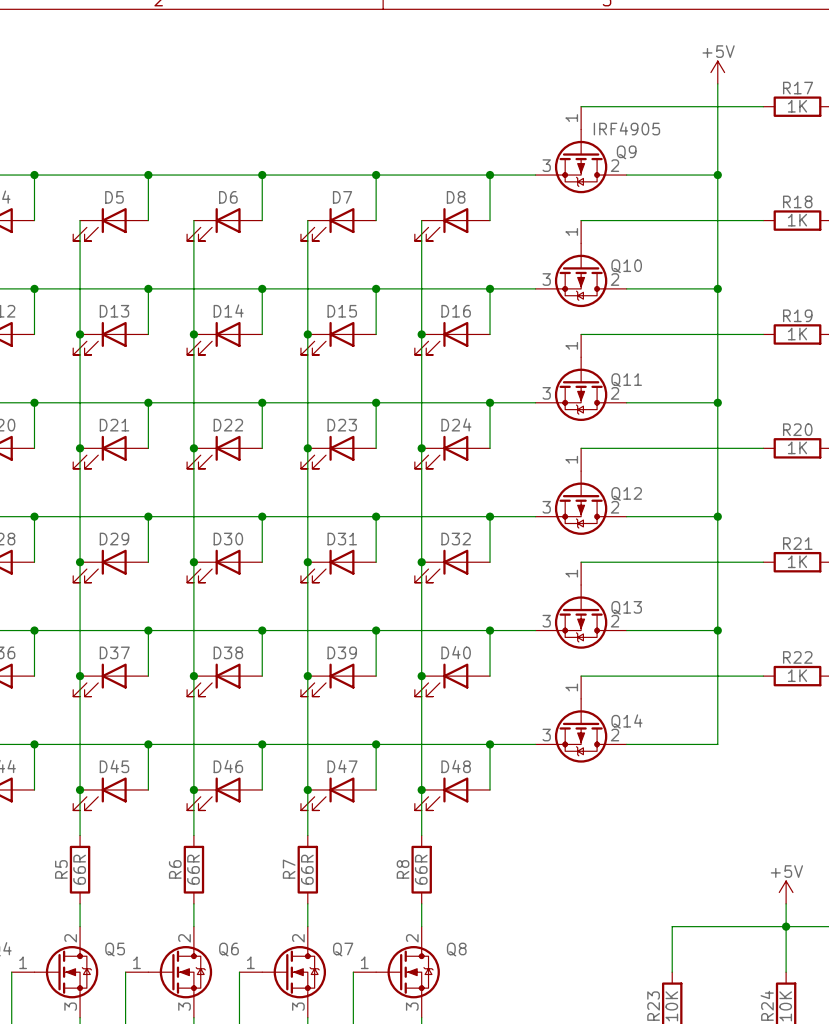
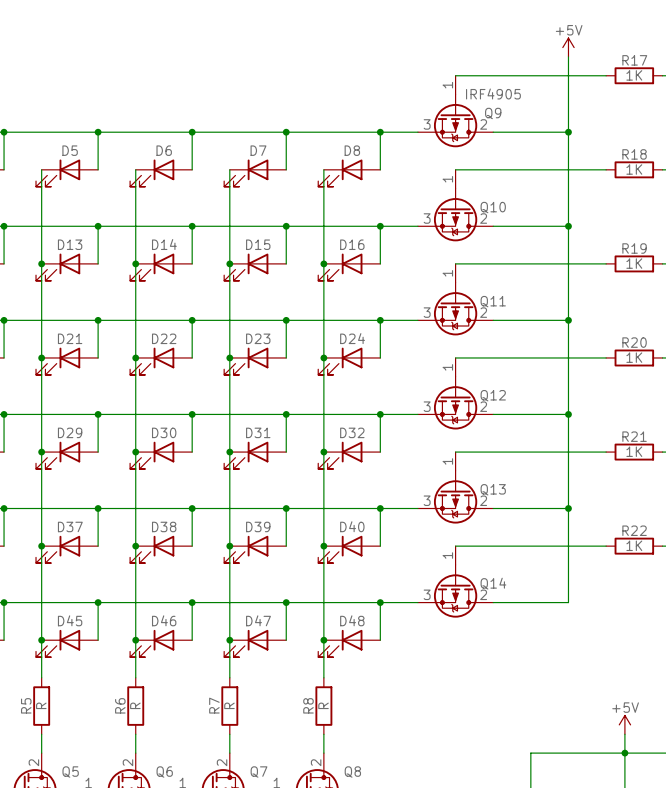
R5 value: 66R (79, 869) -> R (41, 705)
R6 value: 66R (193, 869) -> R (135, 705)
R7 value: 66R (307, 869) -> R (229, 705)
R8 value: 66R (421, 869) -> R (323, 705)

